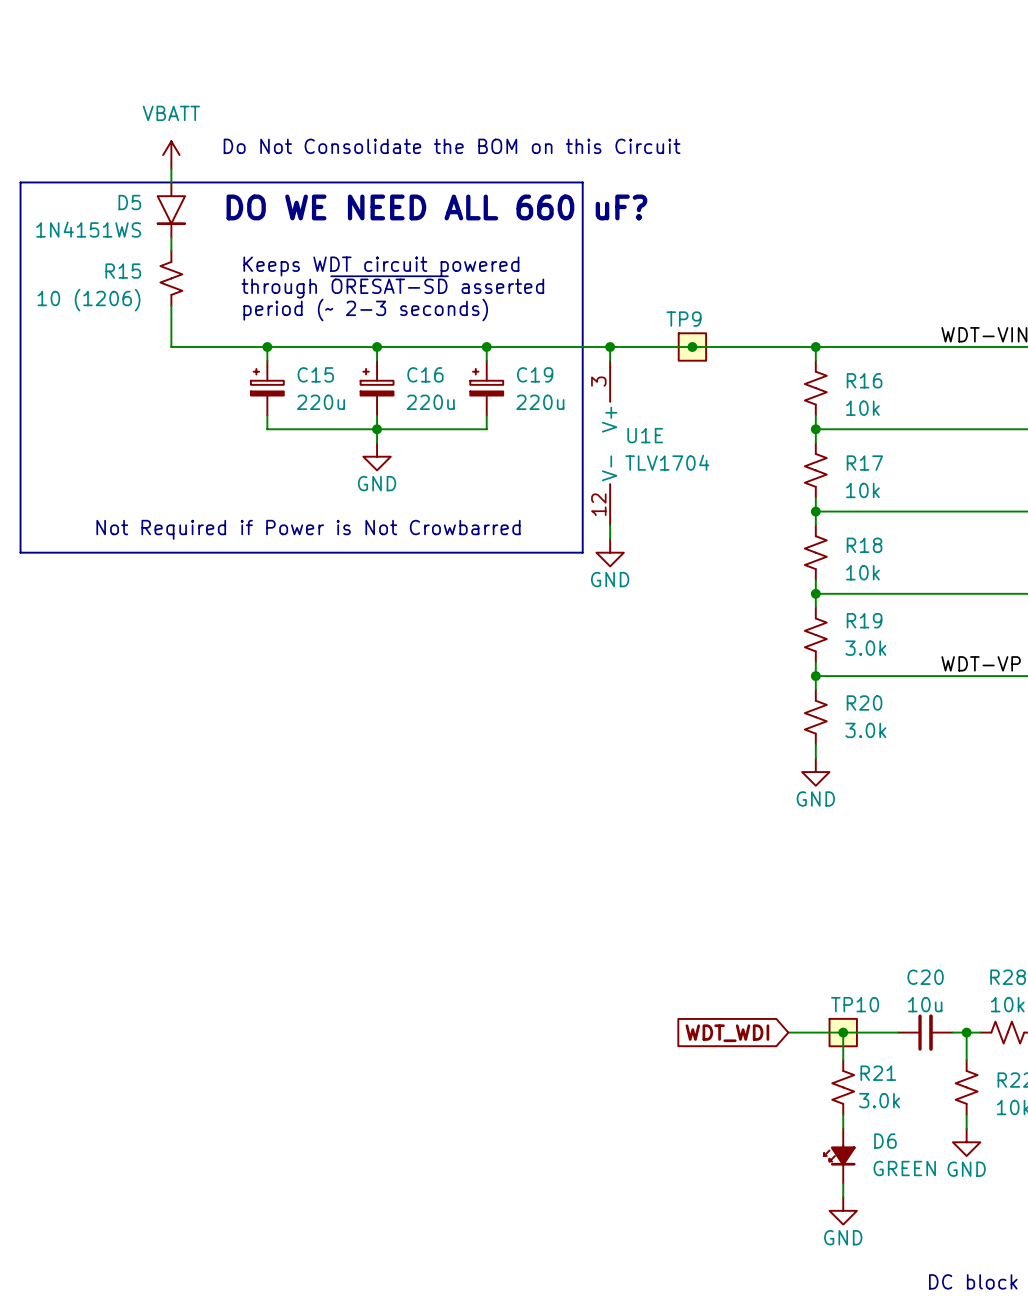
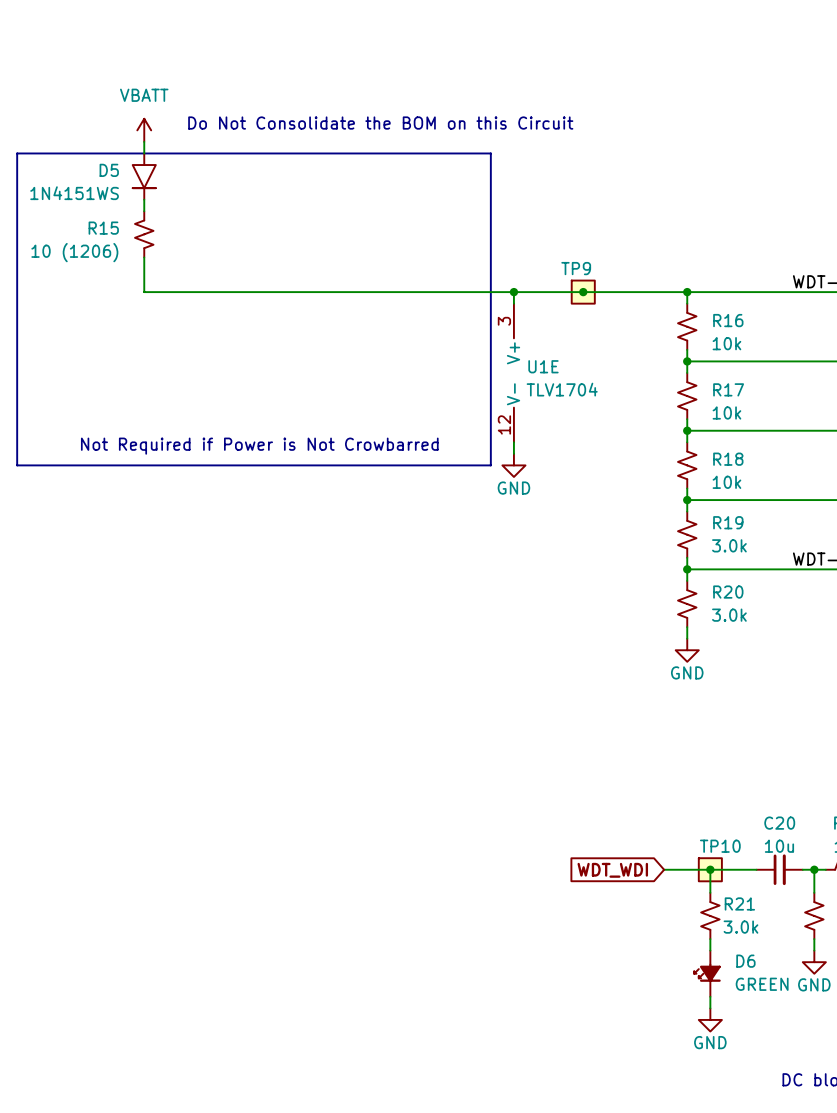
text: DO WE NEED ALL 660 uF? (436, 207) -> none
text: Keeps WDT circuit powered (381, 266) -> none
text: through ~{ORESAT-SD} asserted (392, 286) -> none
text: period (~ 2-3 seconds) (365, 309) -> none
wire: (267, 347) (267, 360) -> none
junction: (267, 347) -> none
wire: (377, 347) (377, 360) -> none
junction: (377, 347) -> none
wire: (486, 347) (486, 360) -> none
junction: (486, 347) -> none
C15: 220u (267, 388) -> none
C16: 220u (377, 388) -> none
C19: 220u (486, 388) -> none
wire: (267, 415) (267, 429) (486, 429) (486, 415) -> none
wire: (377, 415) (377, 442) -> none
junction: (377, 429) -> none
power symbol: GND (377, 456) -> none

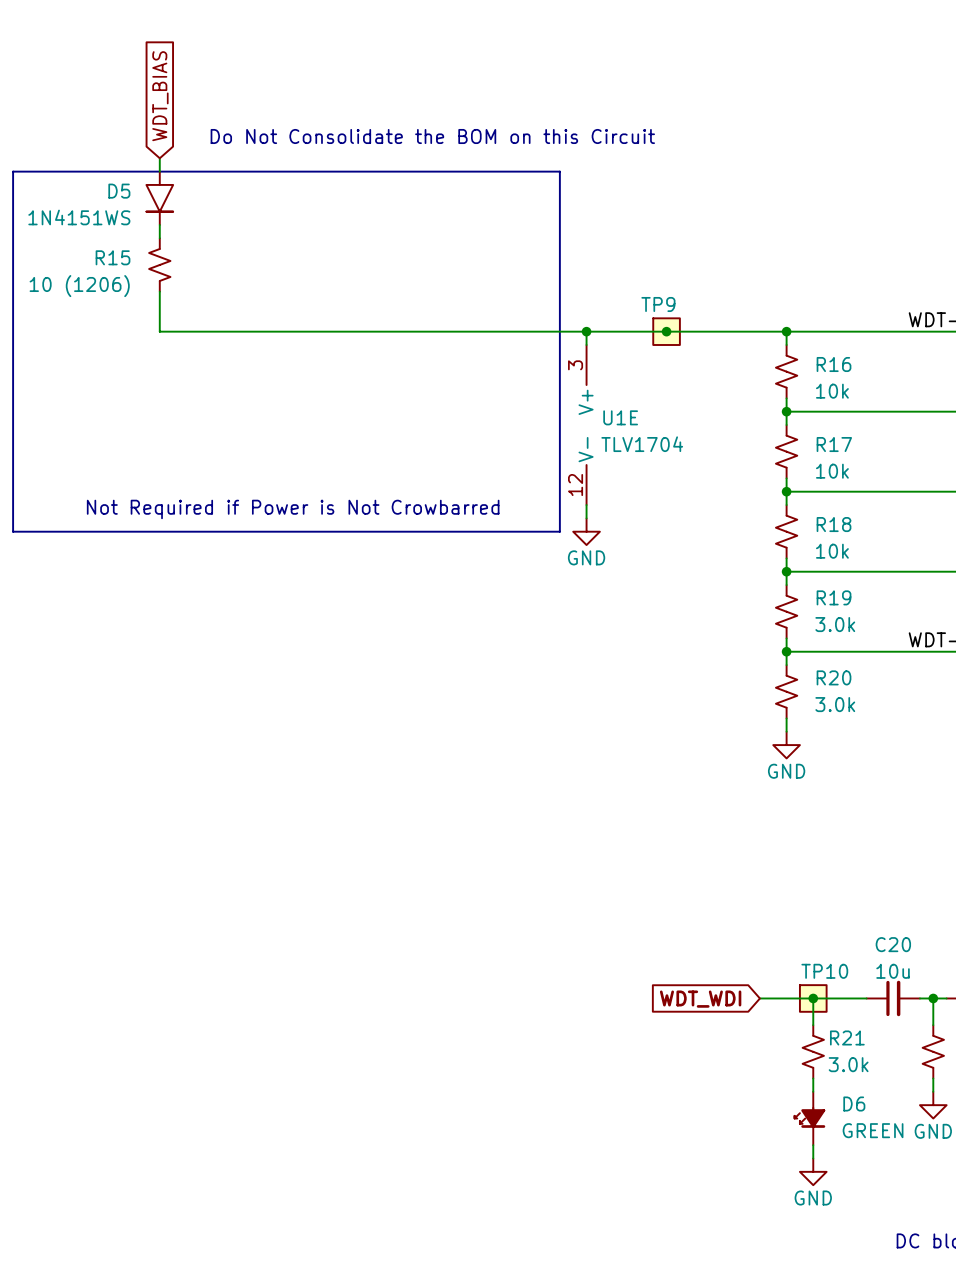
global label: none -> WDT_BIAS (160, 96)
power symbol: VBATT (144, 130) -> none

